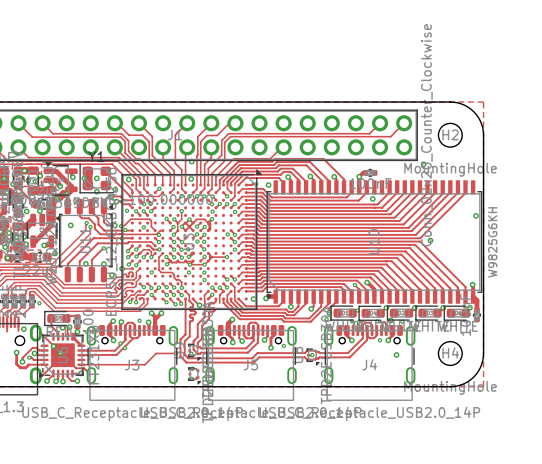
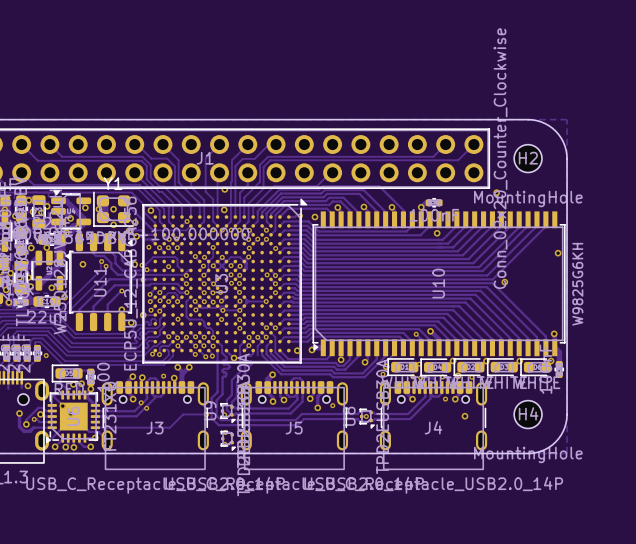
track: (234, 204) (231, 207) -> none
via: (234, 204) -> none
via: (85, 263) -> none

